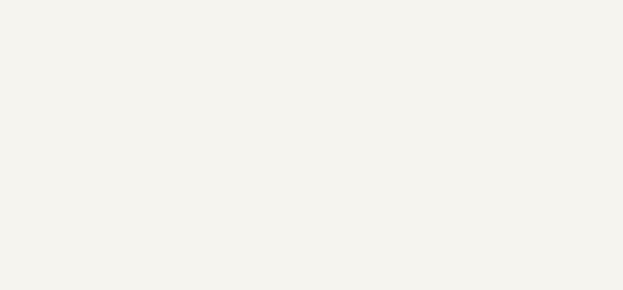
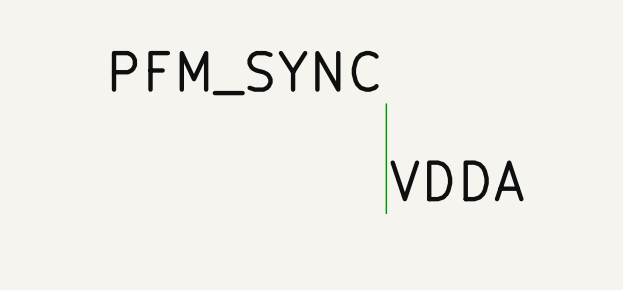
label: none -> PFM_SYNC (245, 73)
wire: none -> (386, 103) (386, 213)
label: none -> VDDA (457, 180)

